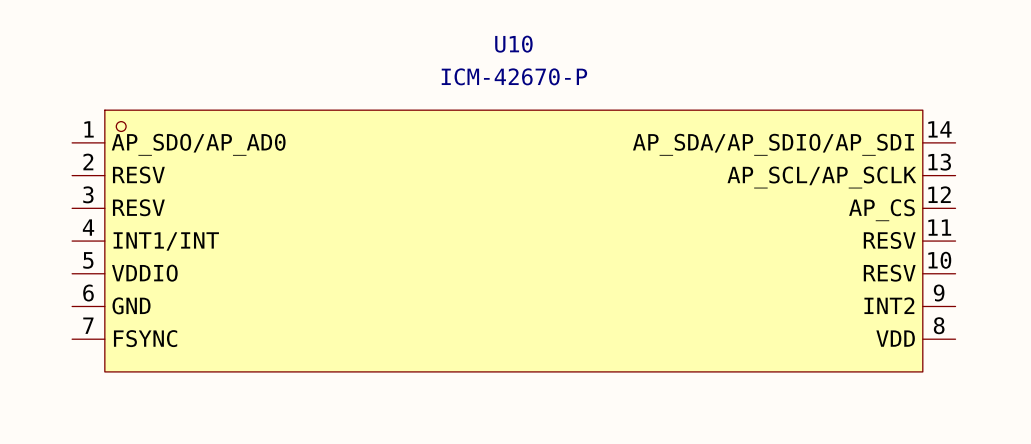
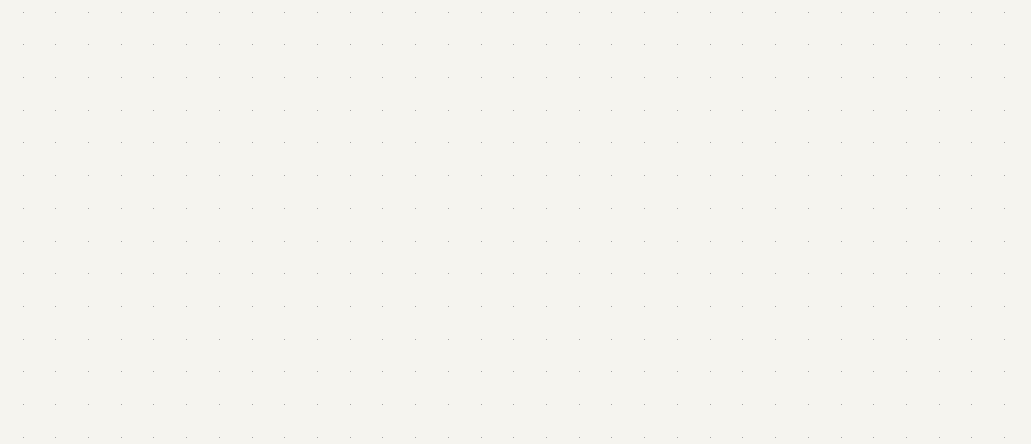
U10: ICM-42670-P (513, 241) -> none

